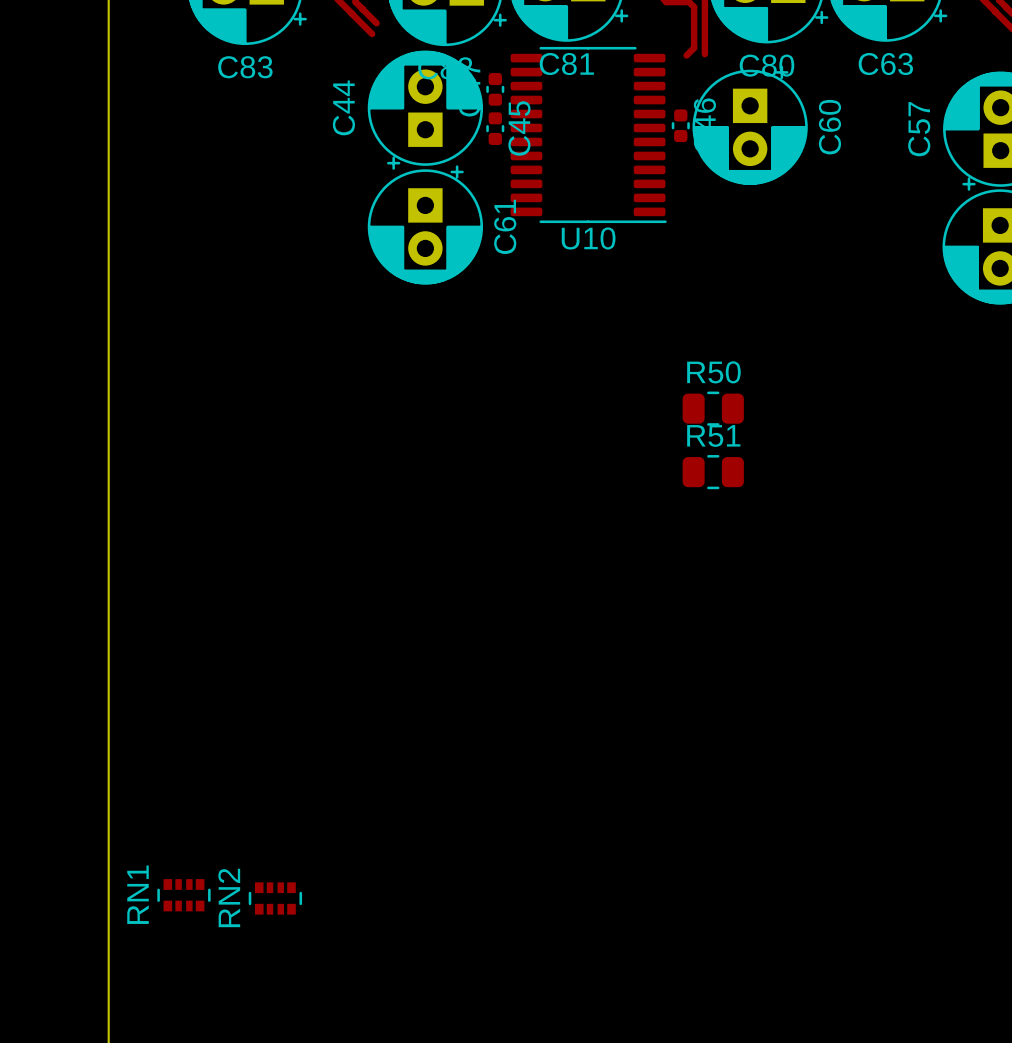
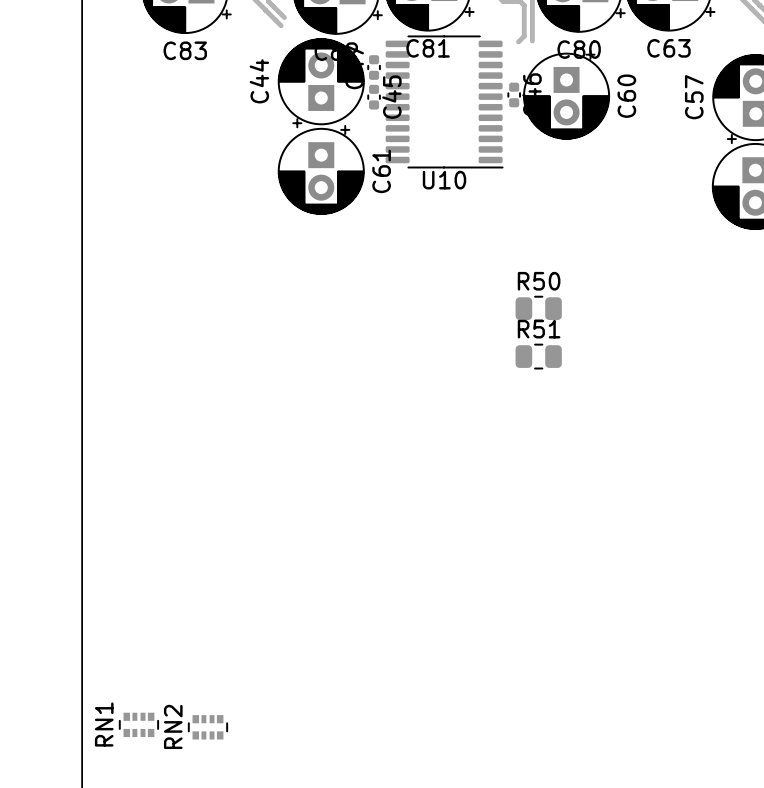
RN1 position: (183, 895) -> (138, 724)
RN2 position: (275, 898) -> (207, 727)

